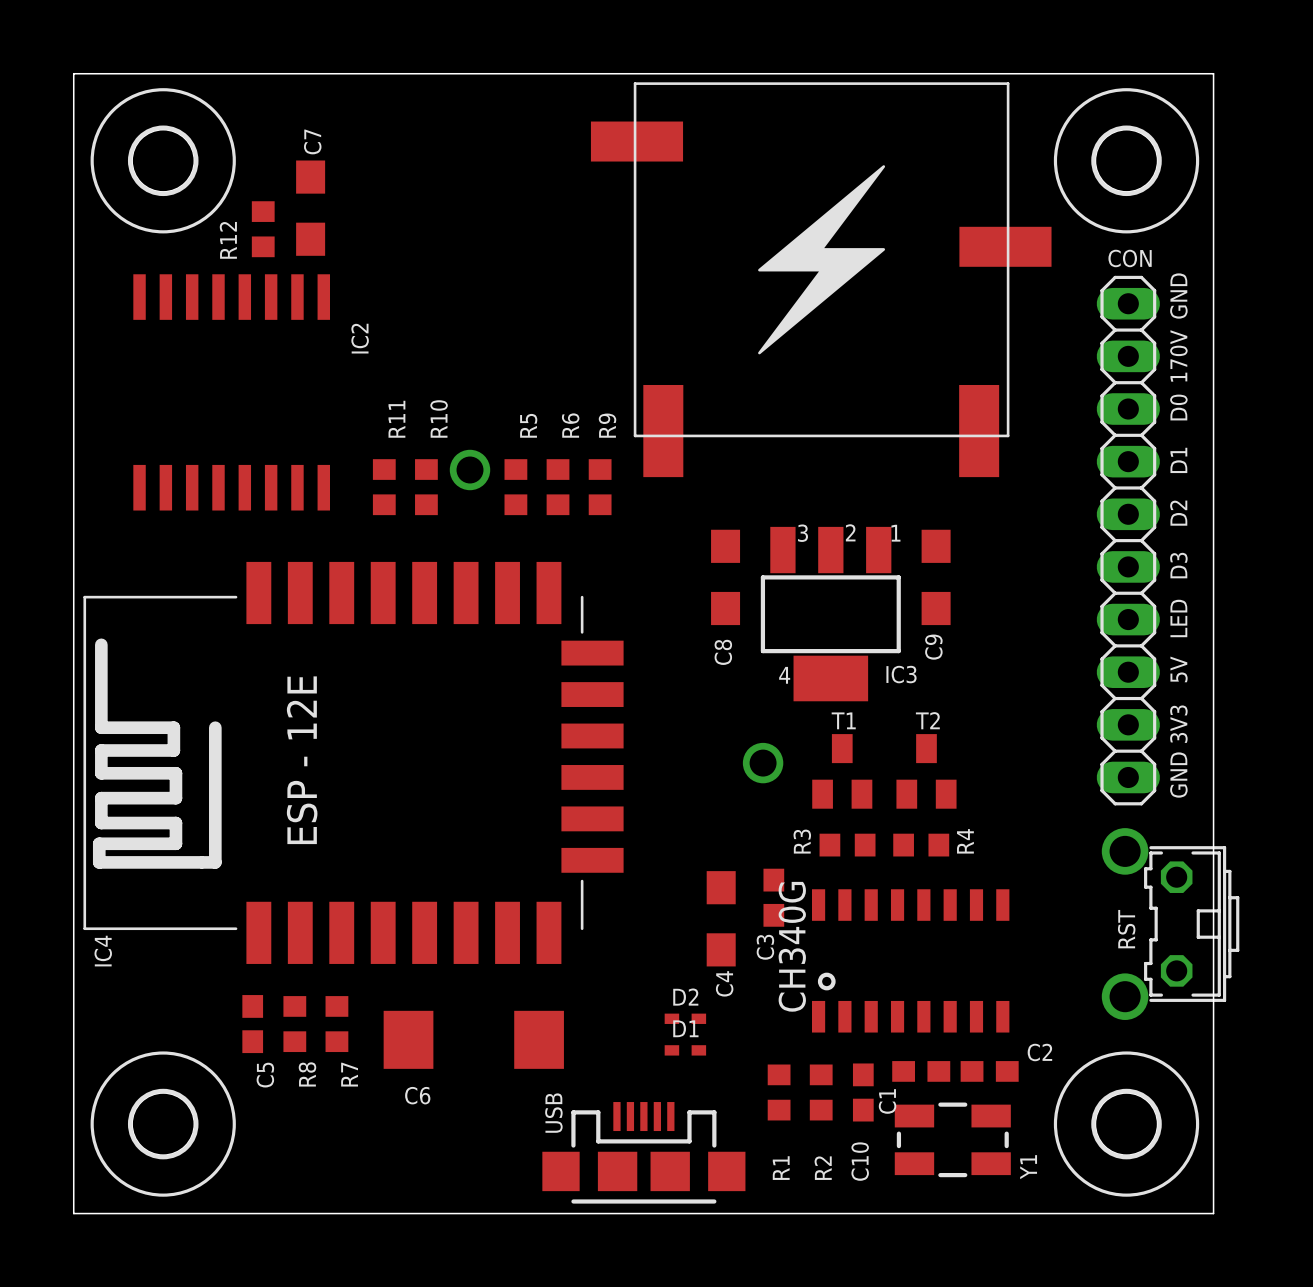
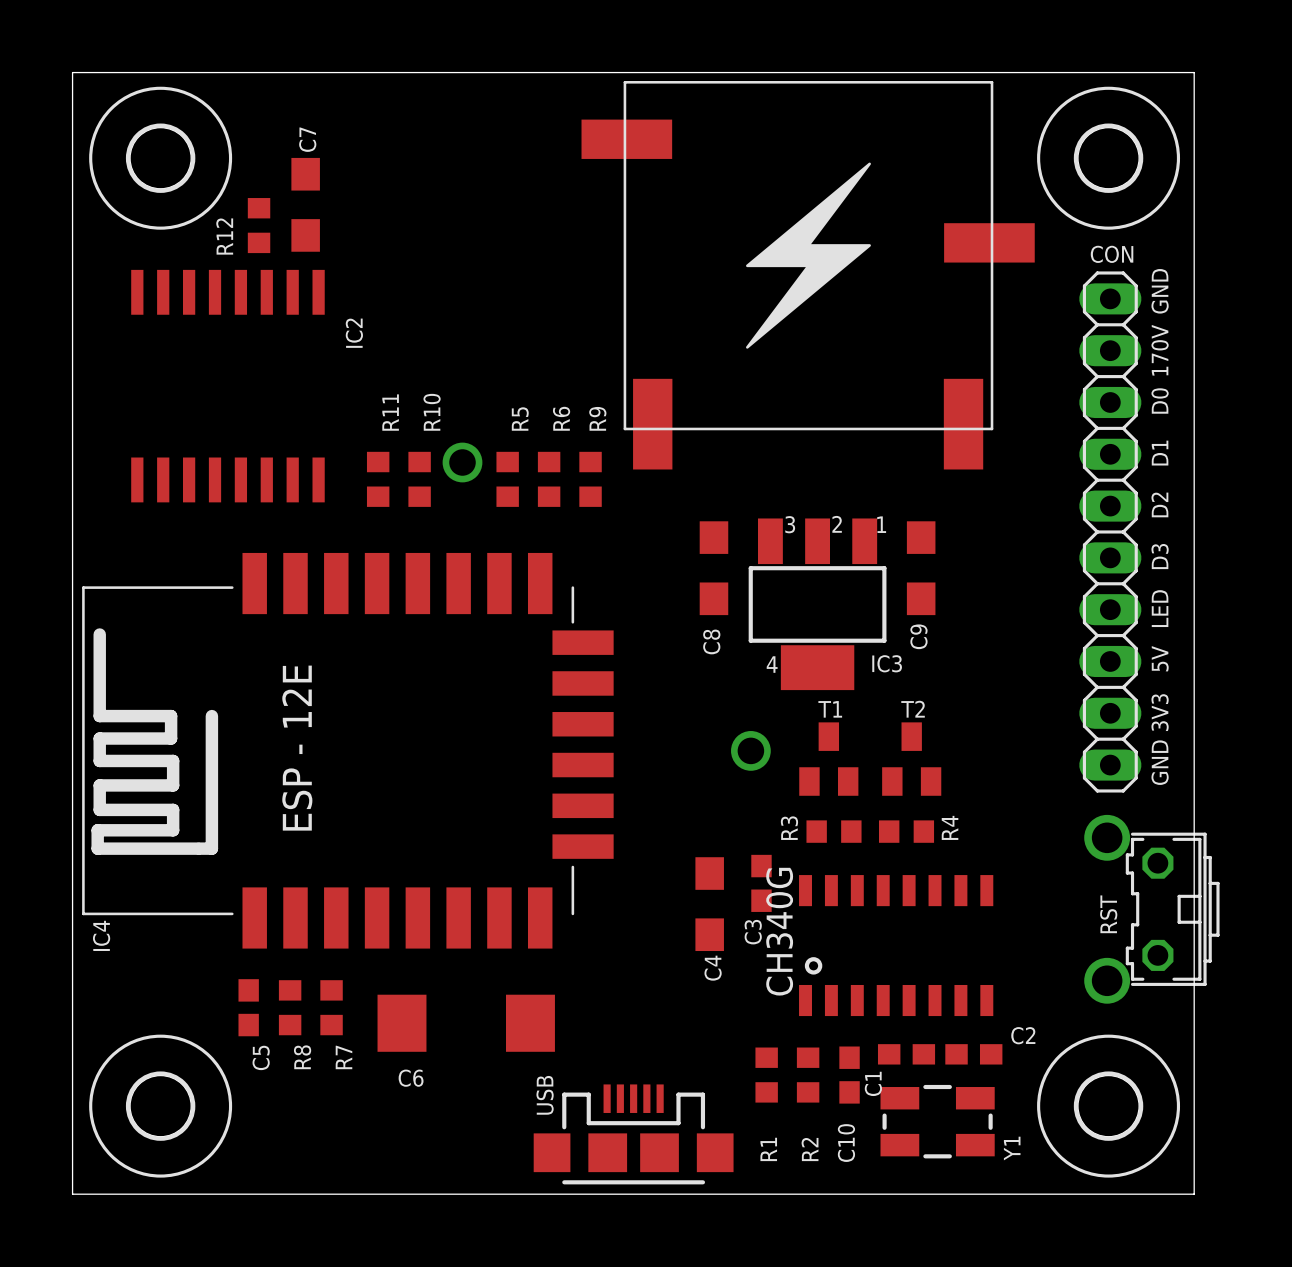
D2: (685, 1018) -> none
D1: (685, 1050) -> none

